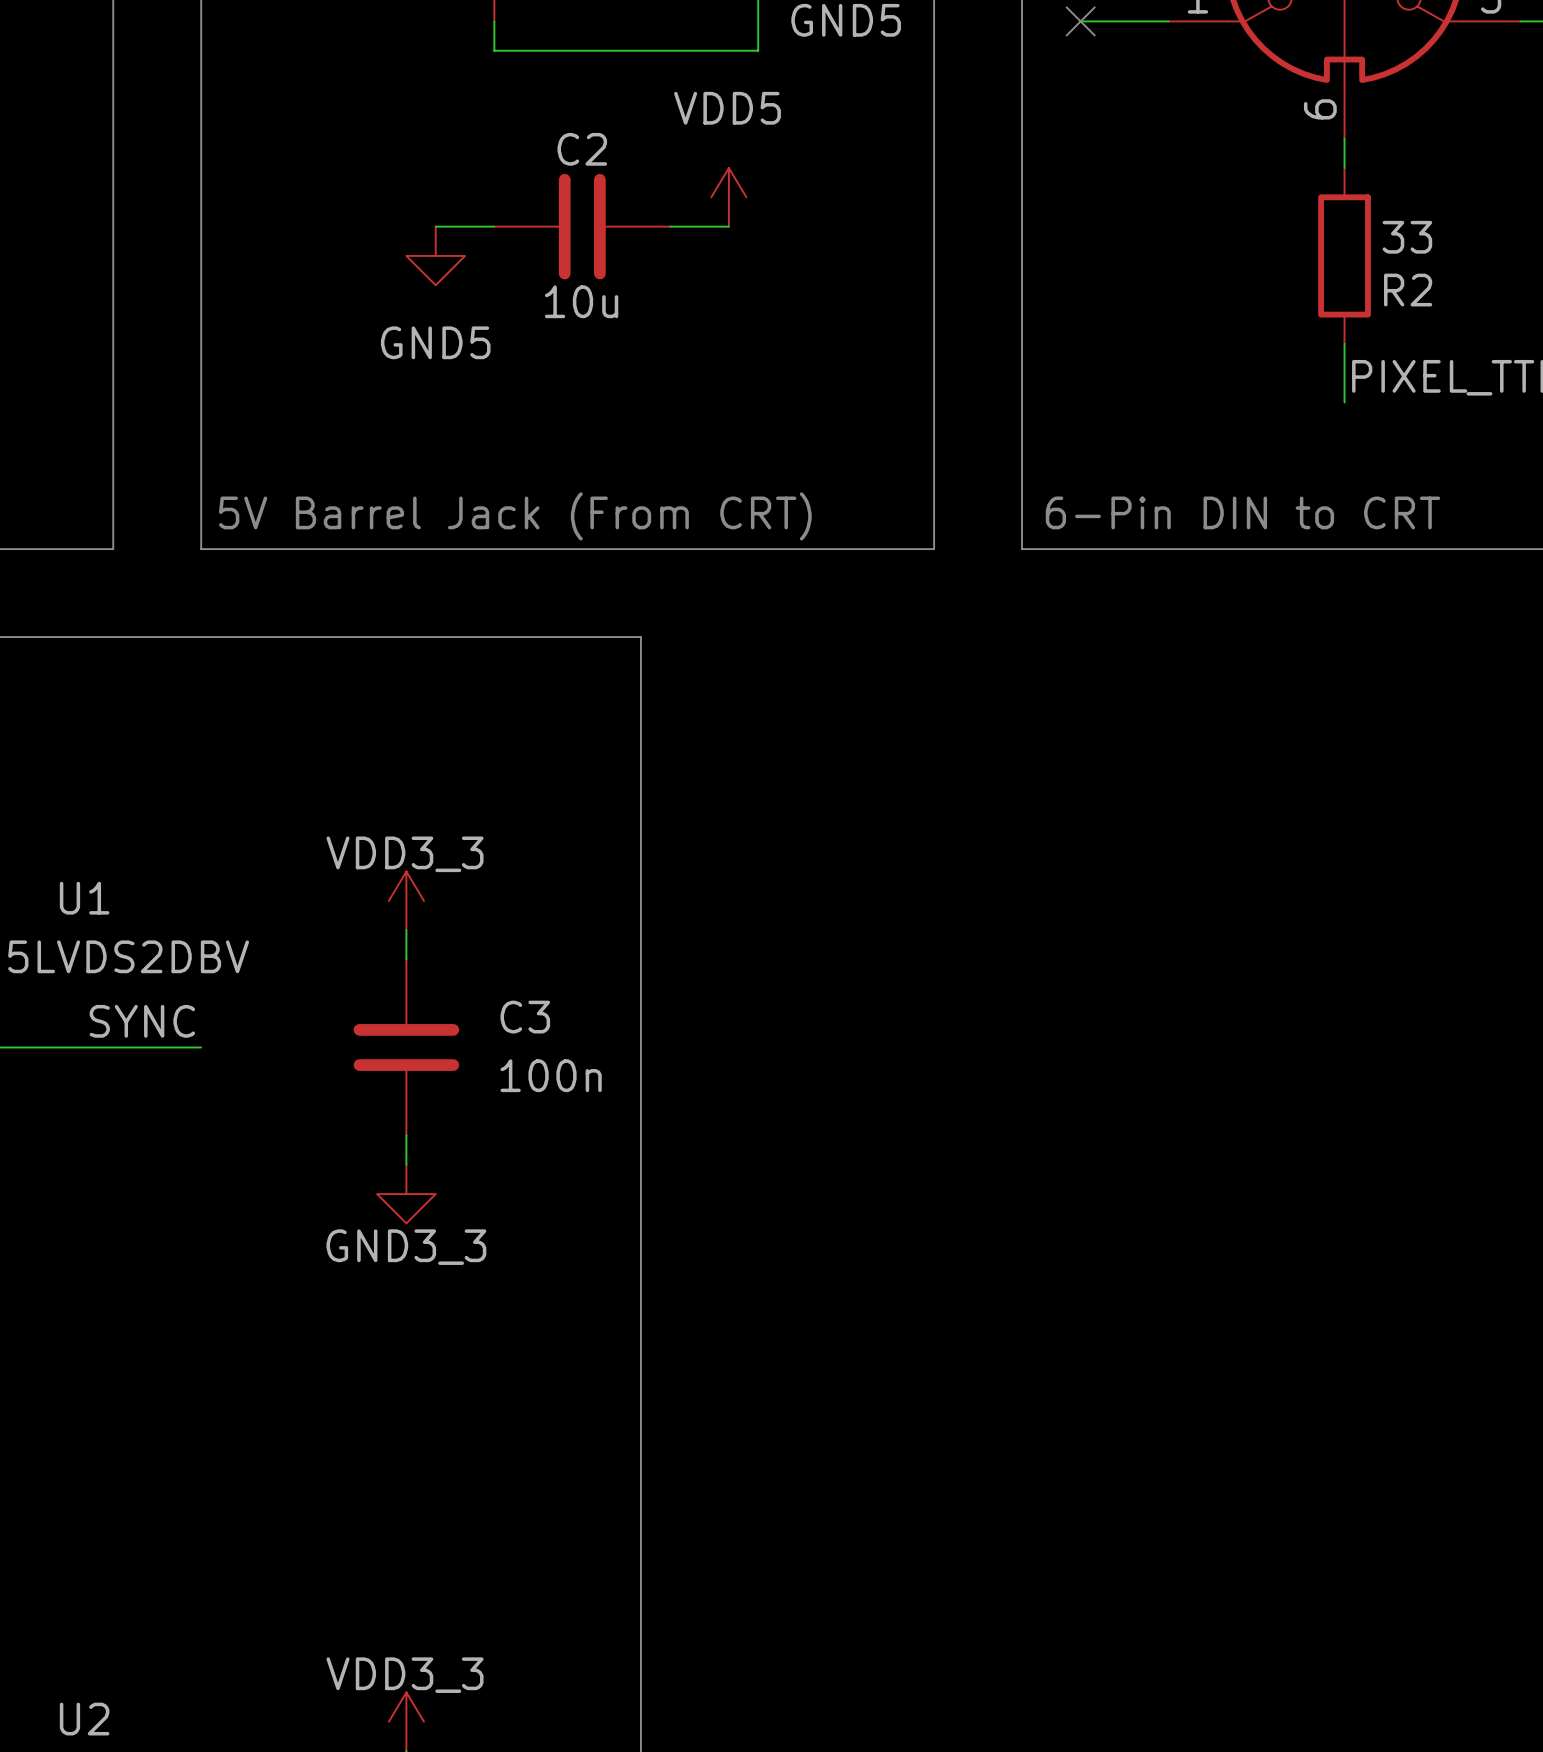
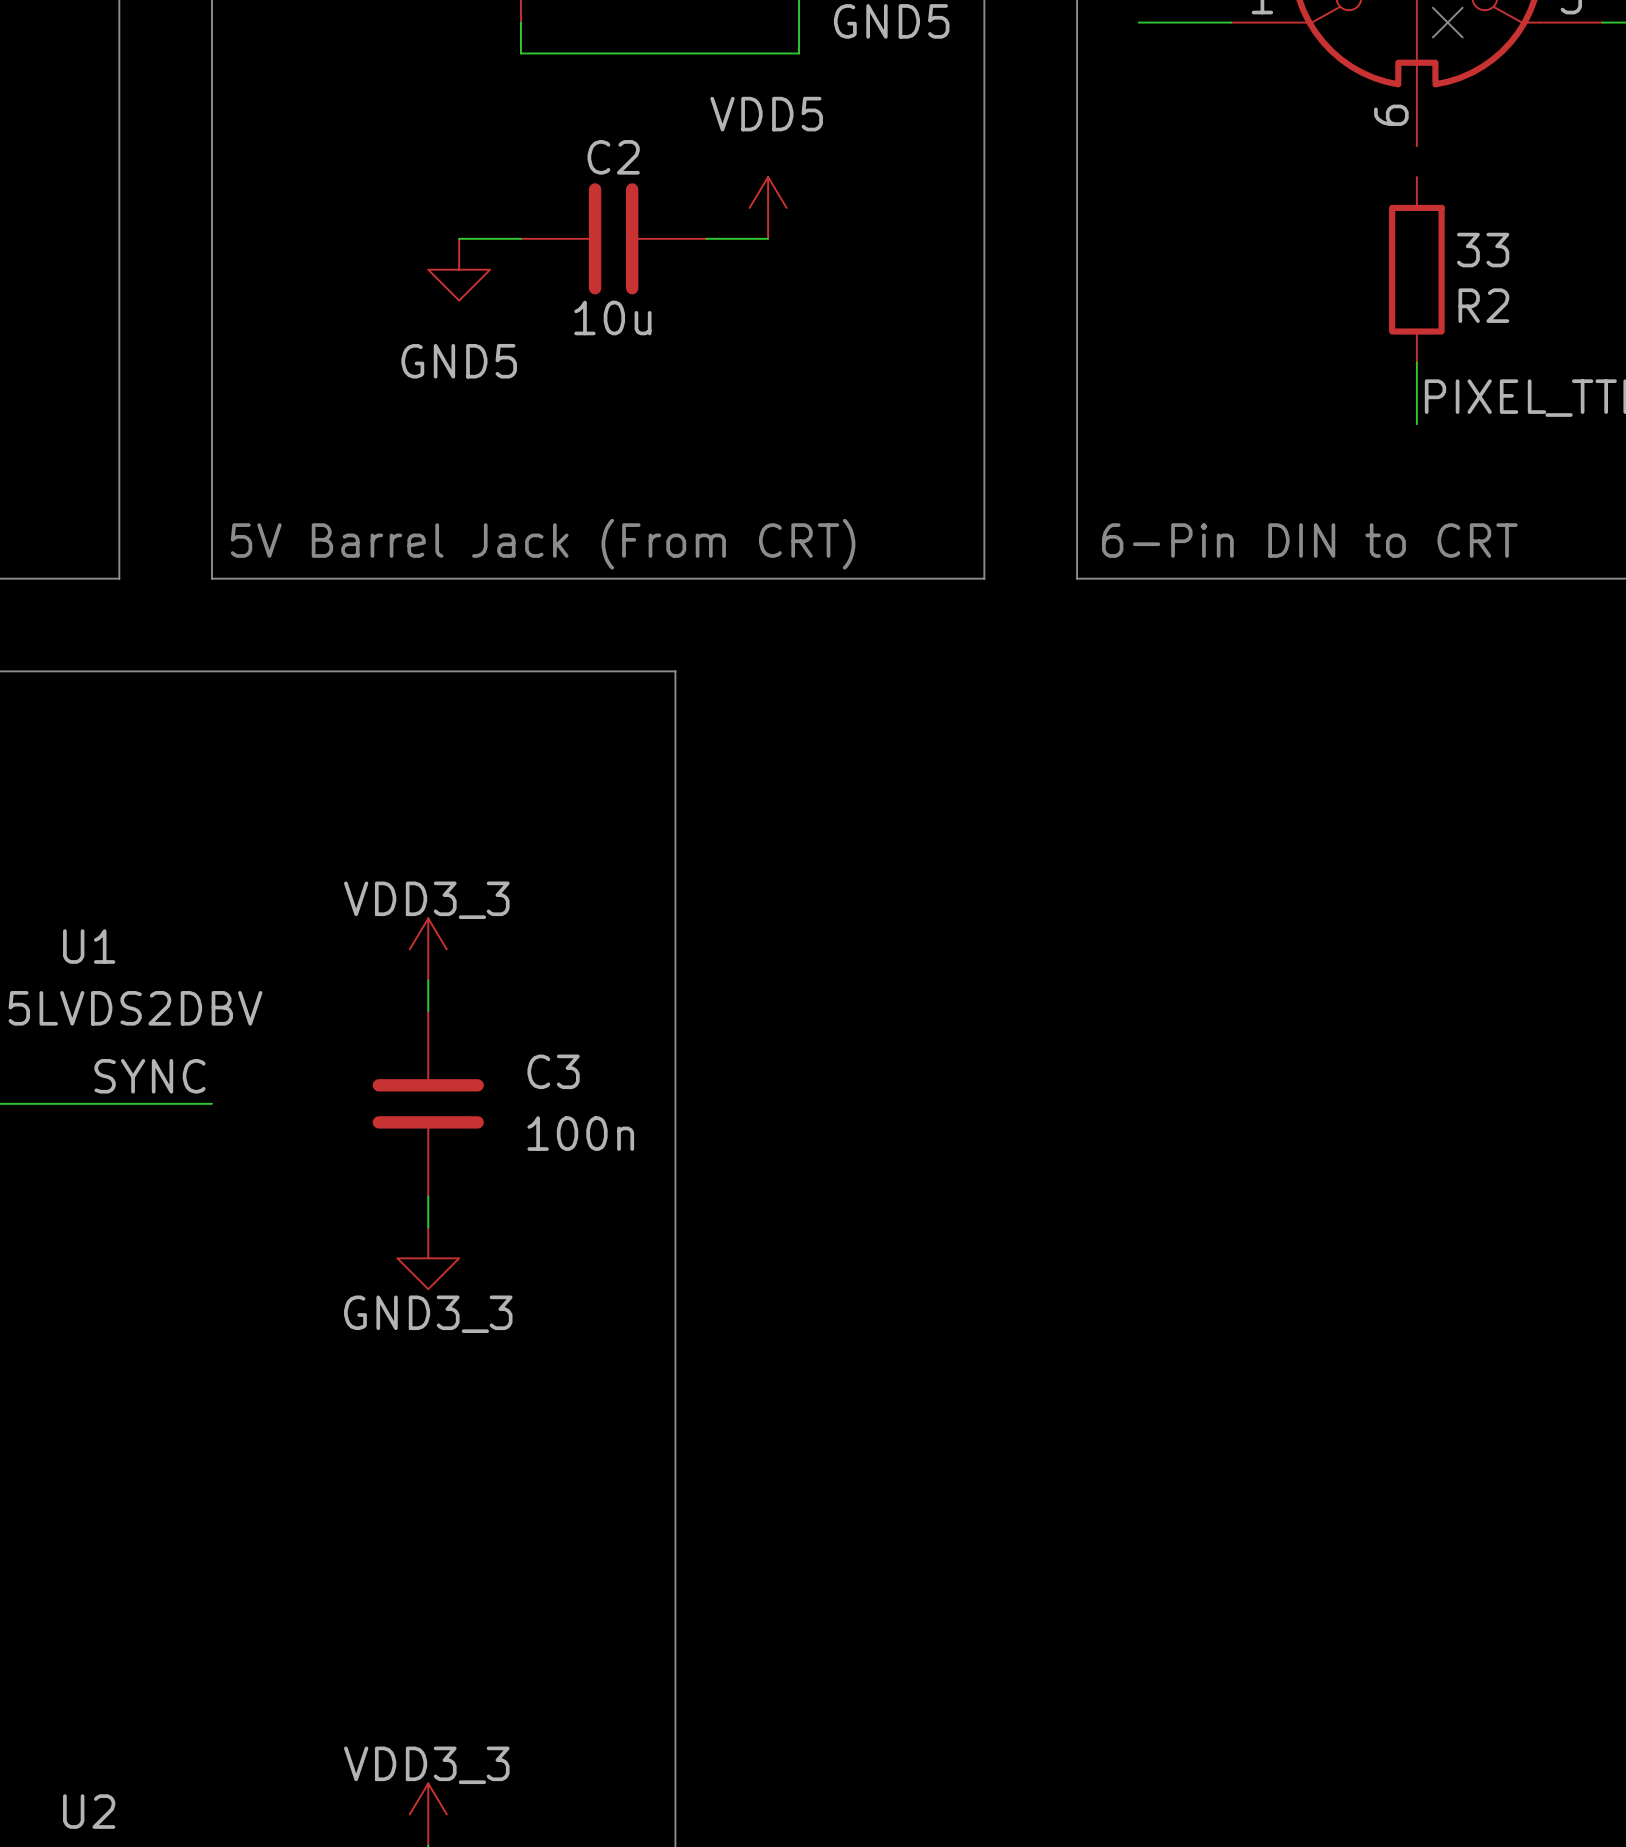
no-connect mark: (1080, 21) -> none
no-connect mark: none -> (1447, 22)
wire: (1344, 138) (1344, 168) -> none

